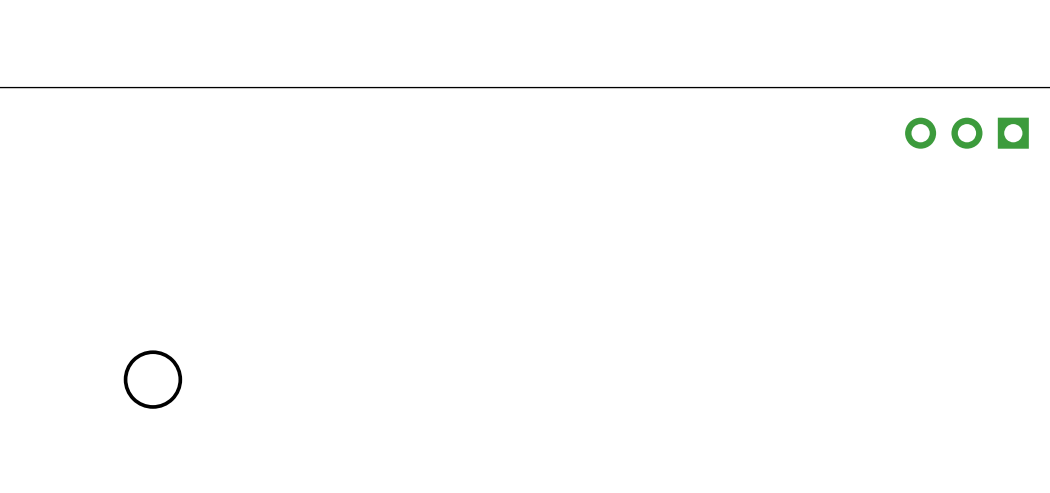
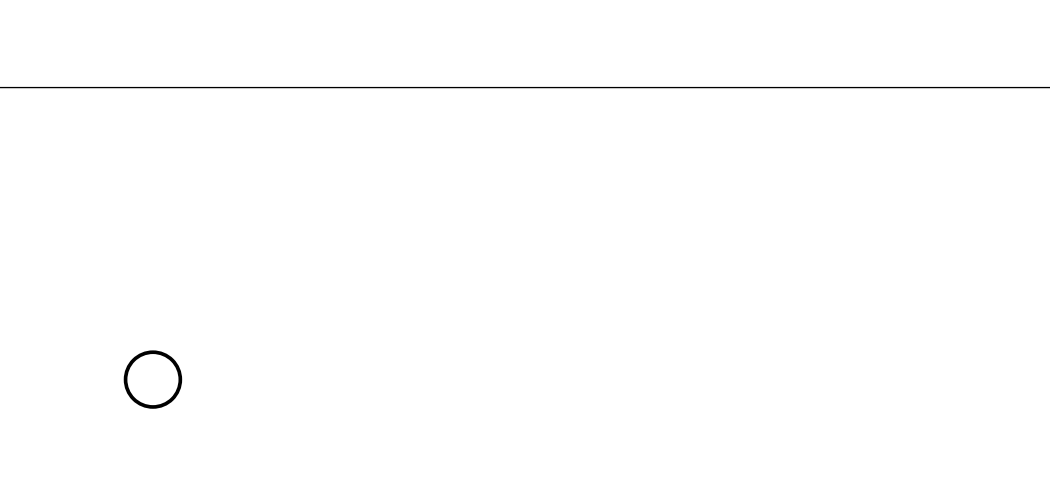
part: (966, 133) -> none

